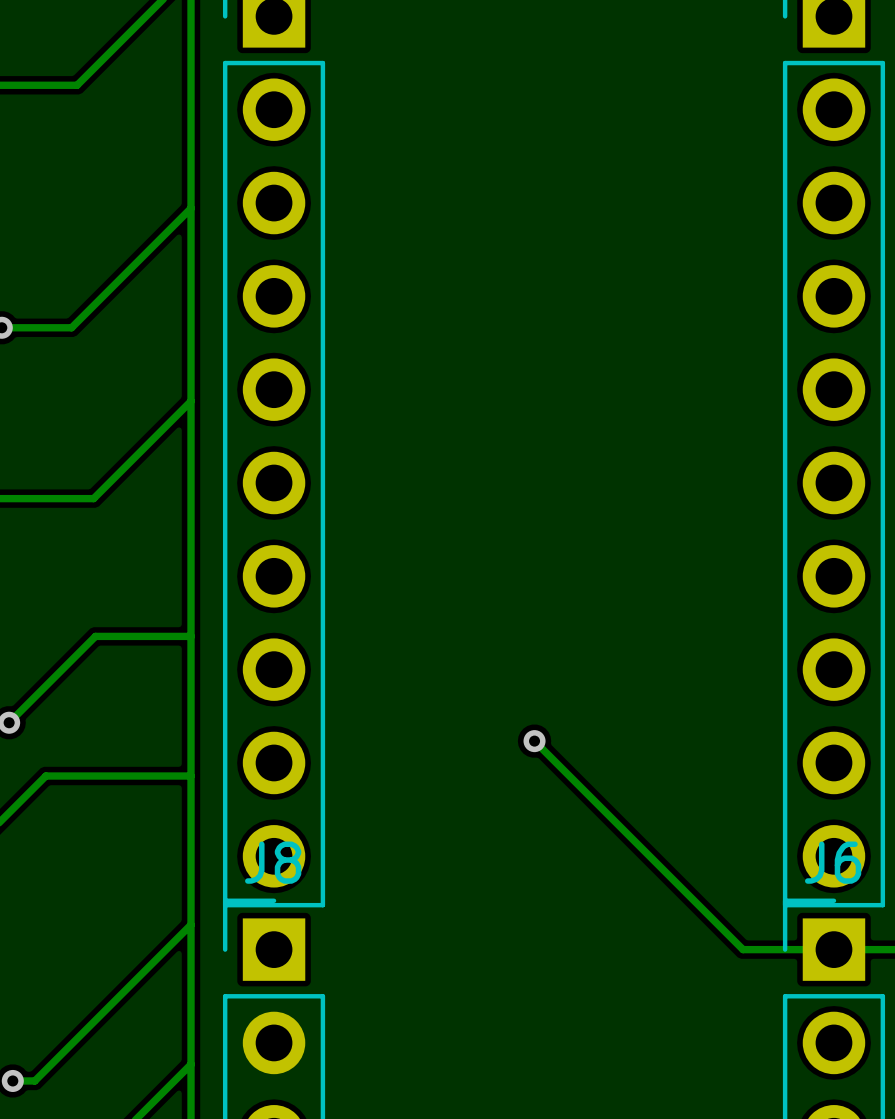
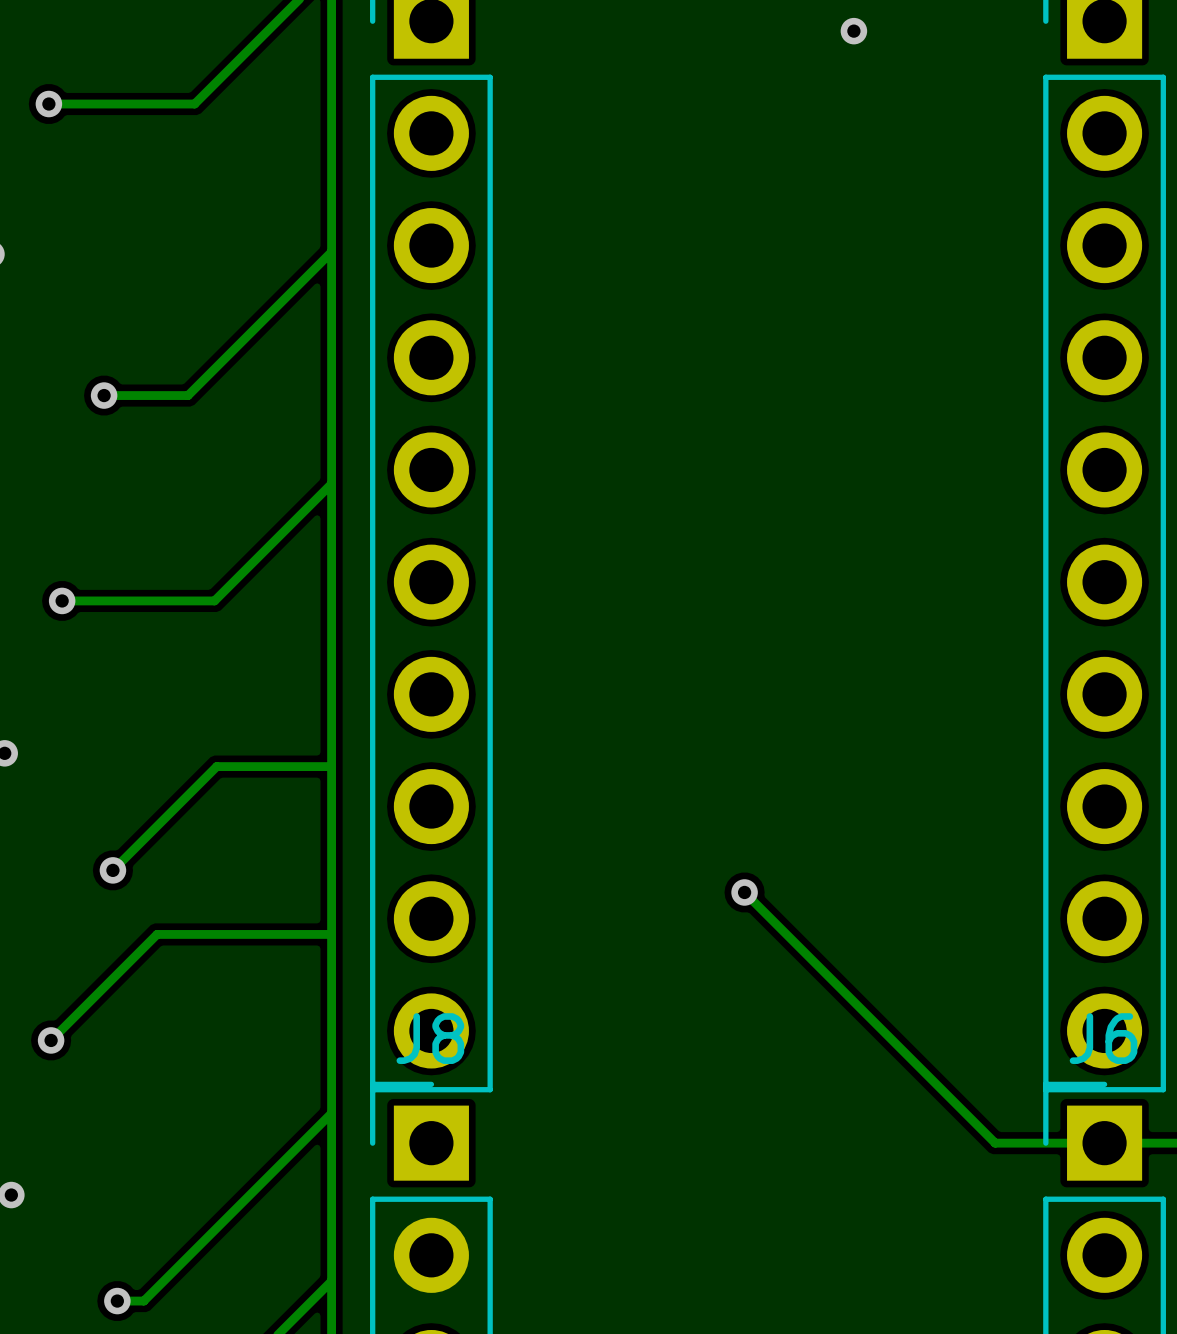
via: none -> (853, 31)

